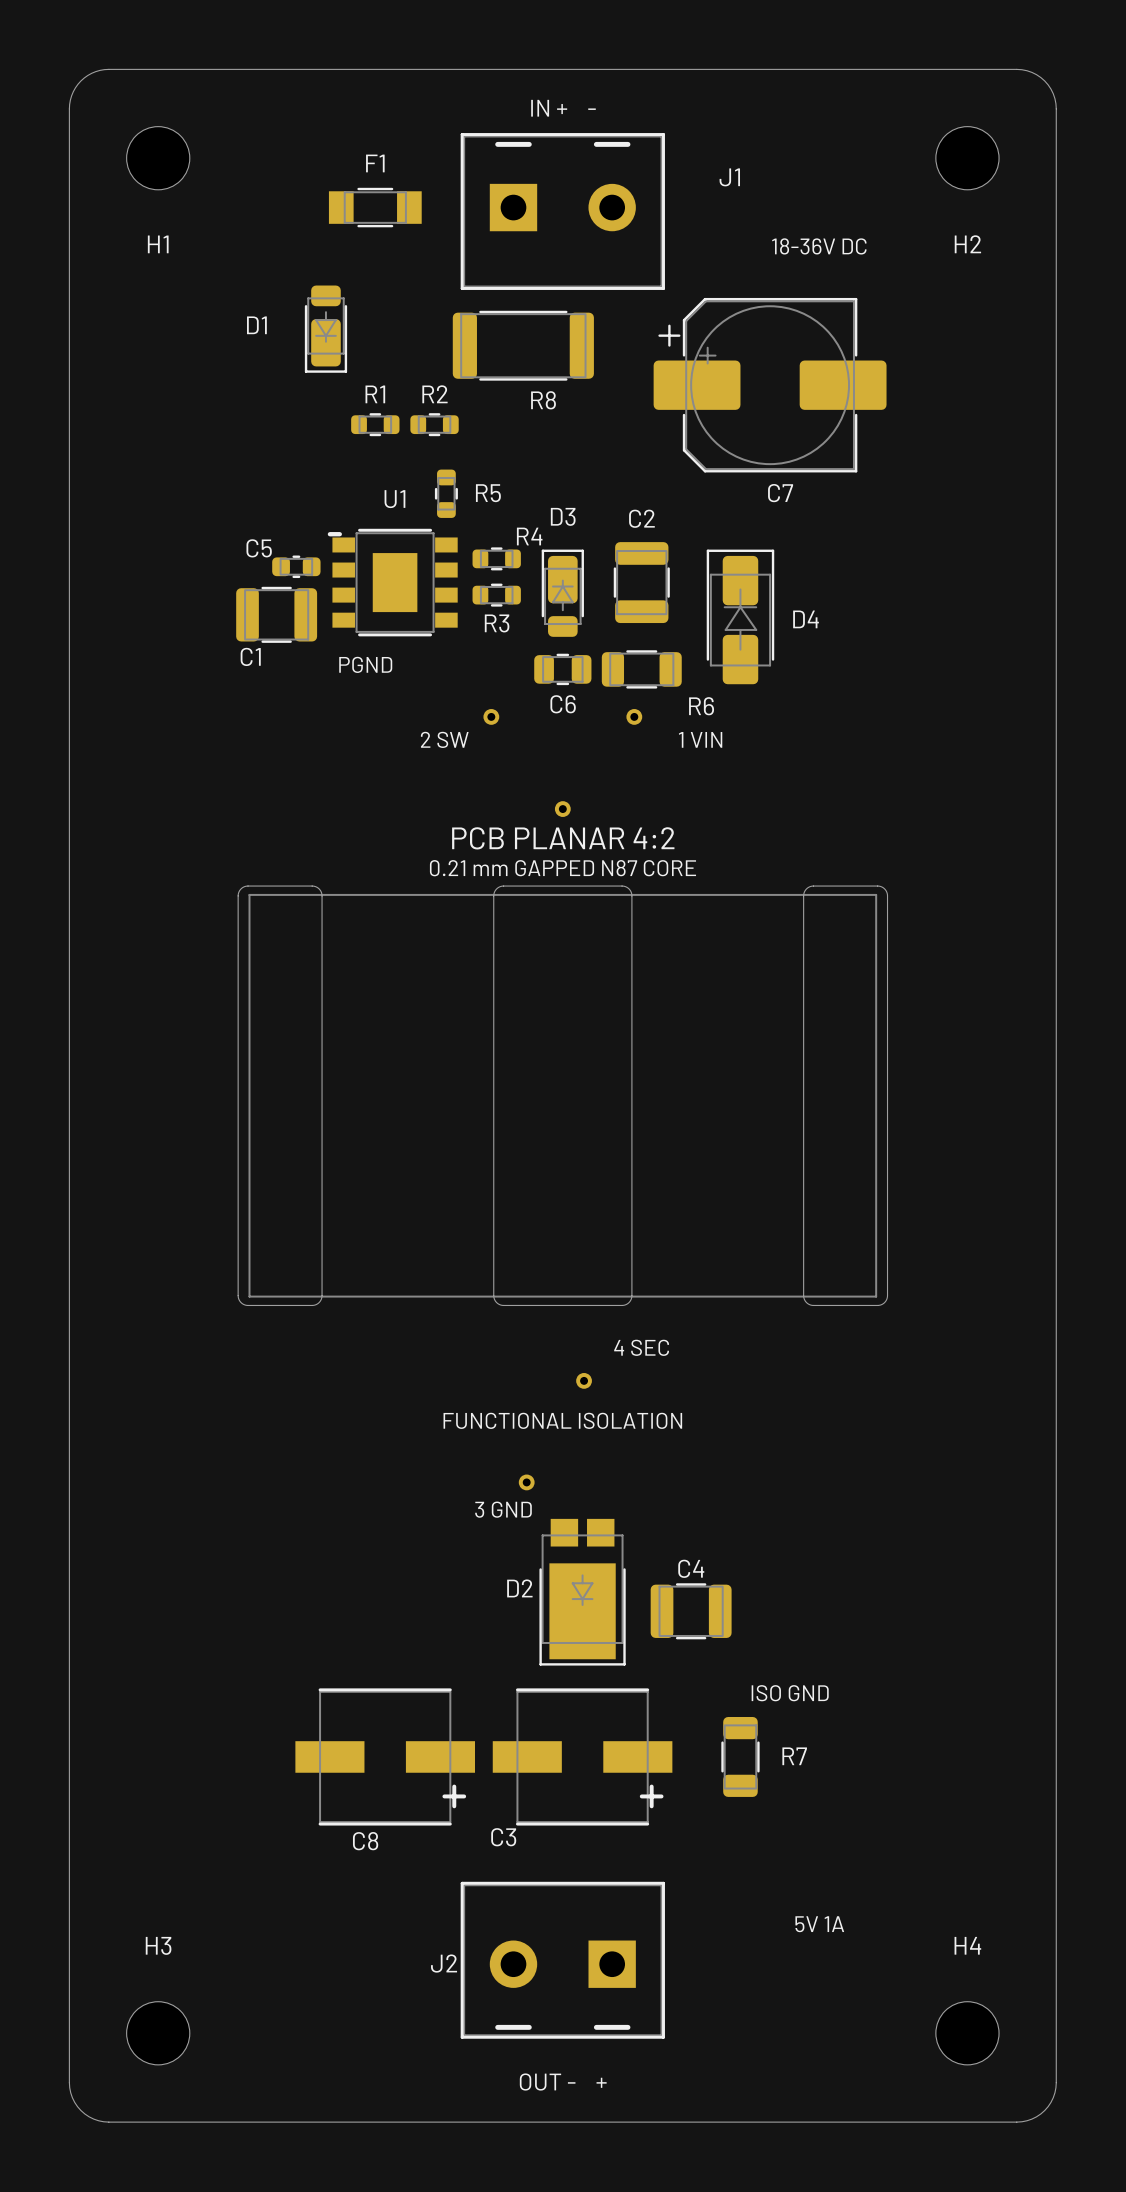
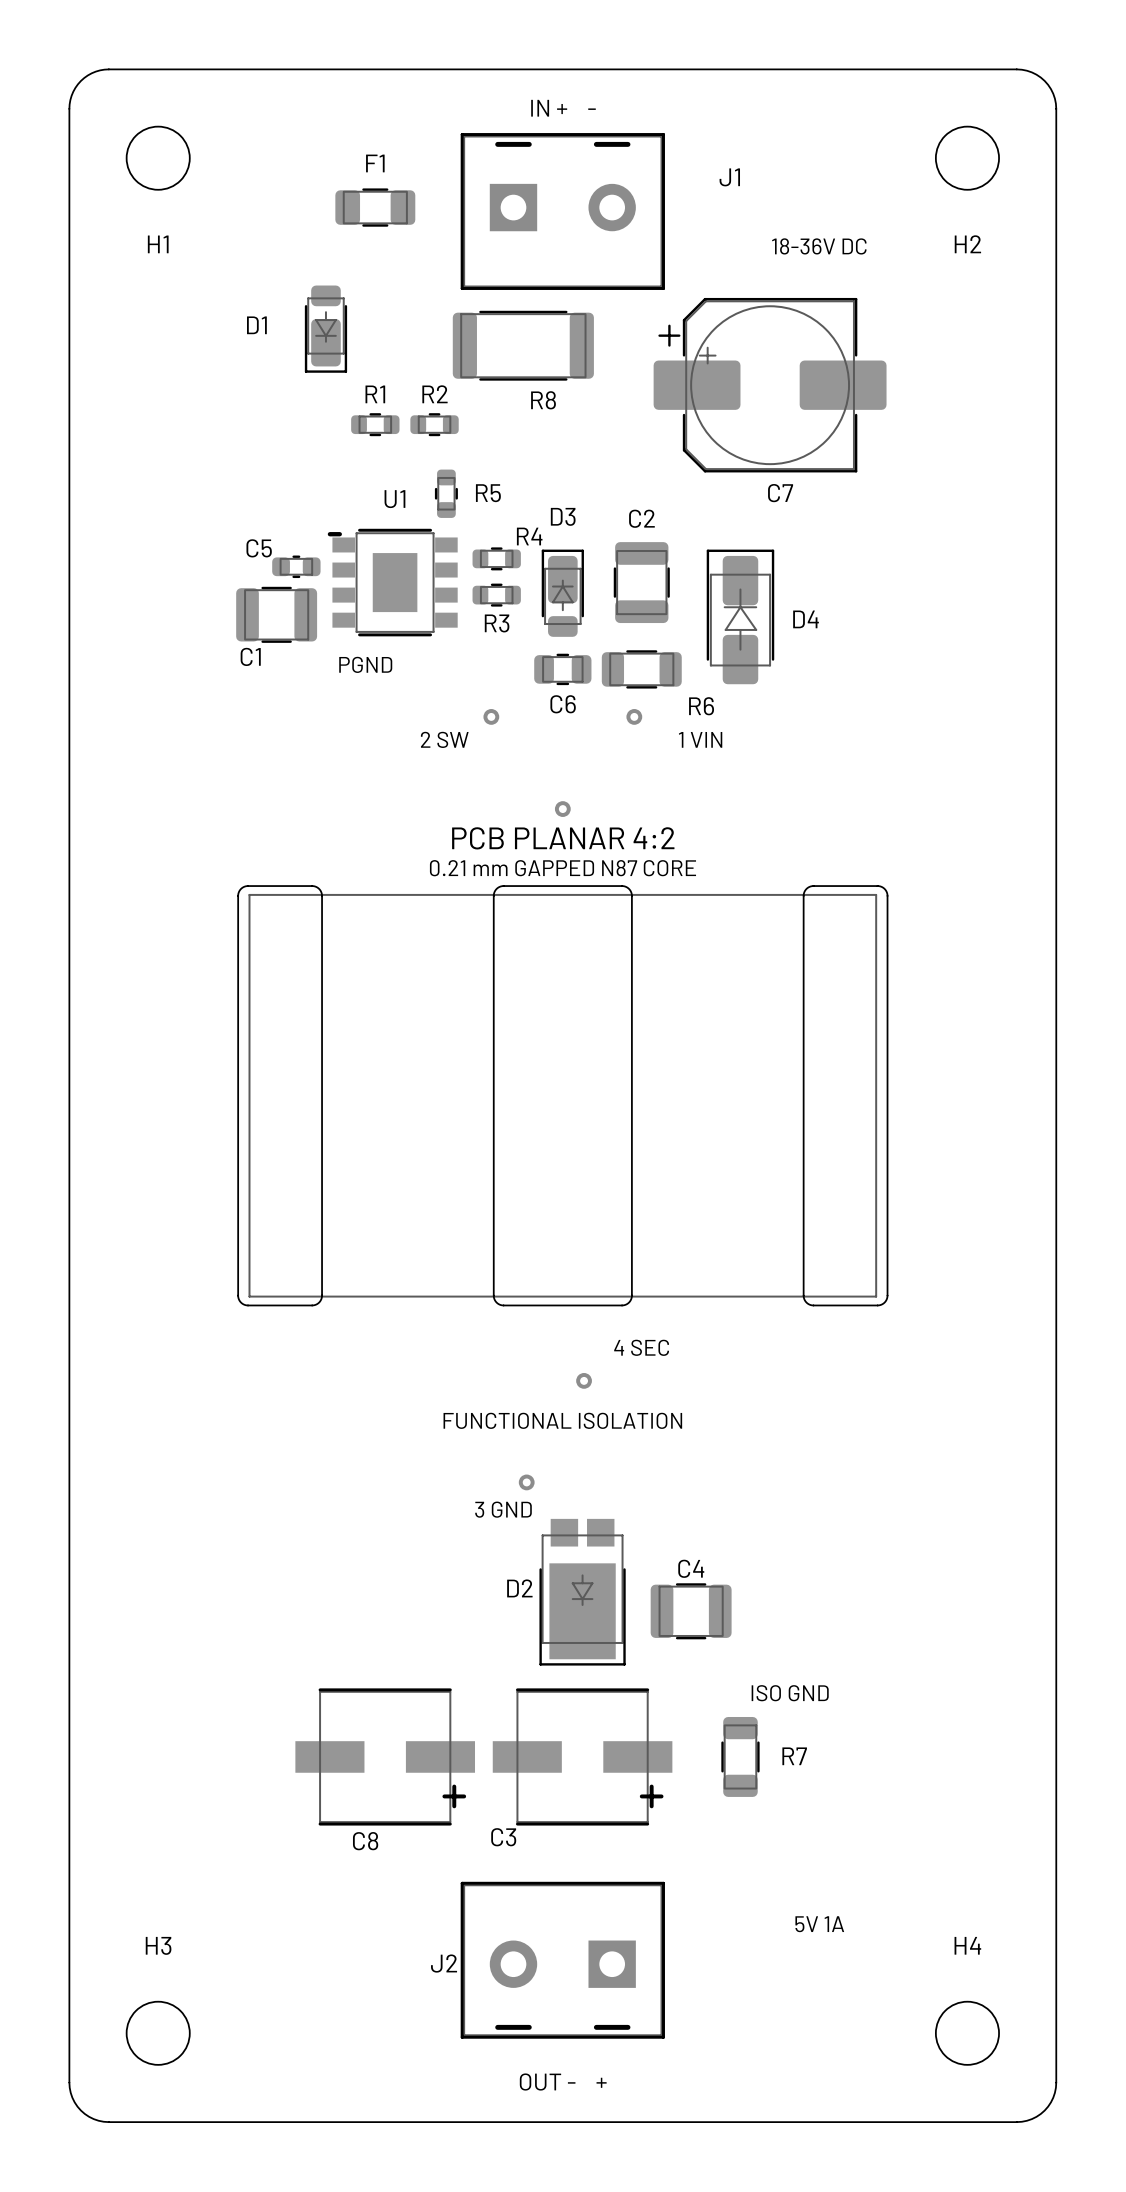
F1 footprint: [328, 187, 422, 228] -> [335, 188, 416, 227]

